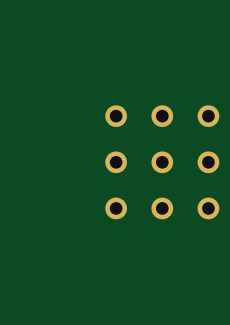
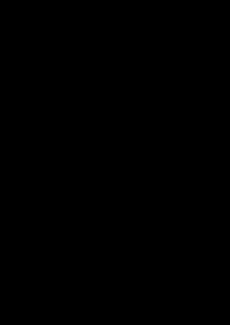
part: (162, 162) -> none

